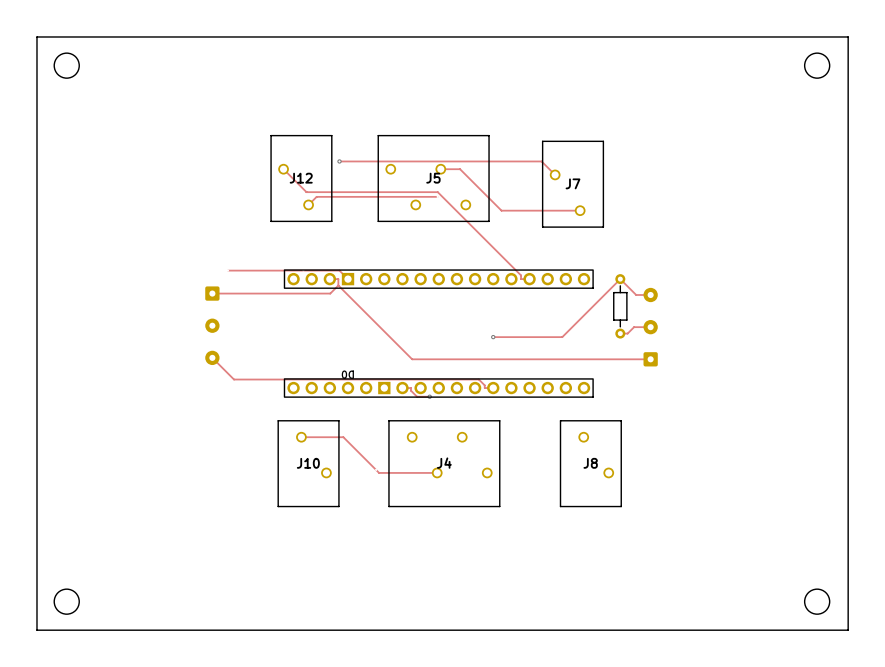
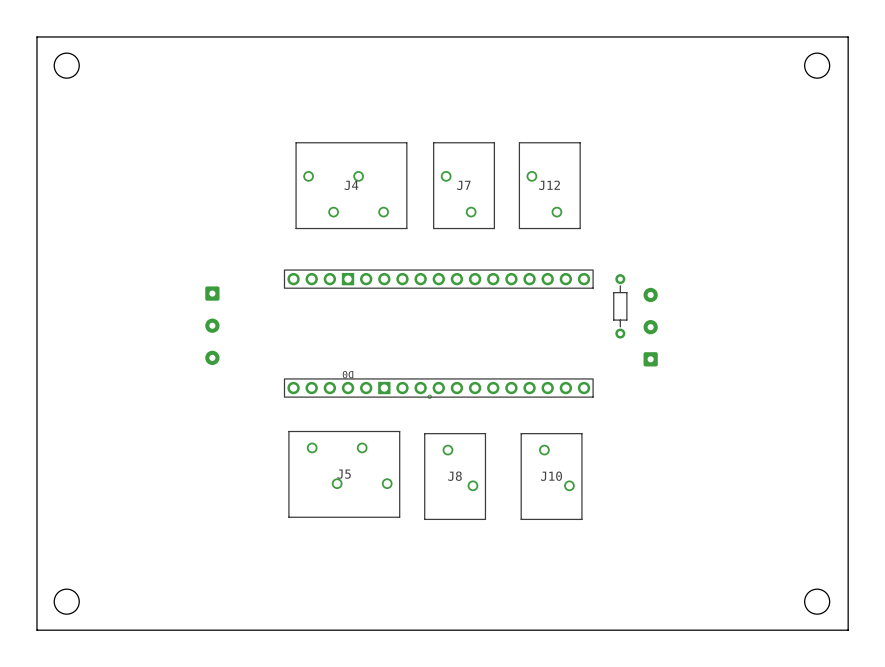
track: (339, 161) (541, 161) (555, 174) -> none
via: (339, 161) -> none
track: (283, 169) (306, 192) (437, 192) (521, 275) (521, 279) (529, 279) -> none
track: (440, 169) (460, 169) (501, 210) (580, 210) -> none
J12 position: (301, 178) -> (549, 185)
J5 rotation: 0° (433, 178) -> 180° (344, 474)
J5 position: (433, 178) -> (344, 474)
J7 position: (573, 184) -> (464, 185)
track: (437, 196) (316, 196) (308, 204) -> none
via: (437, 196) -> none
track: (227, 270) (339, 270) (348, 279) -> none
track: (329, 279) (338, 279) (338, 285) -> none
track: (338, 285) (330, 293) (212, 293) -> none
track: (338, 285) (412, 359) (650, 359) -> none
track: (650, 294) (636, 294) (620, 279) (562, 337) (493, 337) -> none
track: (650, 327) (634, 327) (627, 333) (620, 333) -> none
via: (493, 337) -> none
track: (212, 357) (234, 379) (478, 379) (484, 385) (484, 388) (493, 388) -> none
track: (402, 388) (410, 388) (410, 390) (417, 396) (429, 396) -> none
track: (301, 437) (343, 437) (379, 472) (437, 472) -> none
J10 position: (308, 463) -> (551, 476)
J4 rotation: 0° (444, 463) -> 180° (351, 185)
J4 position: (444, 463) -> (351, 185)
J8 position: (590, 463) -> (455, 476)
via: (376, 469) -> none

